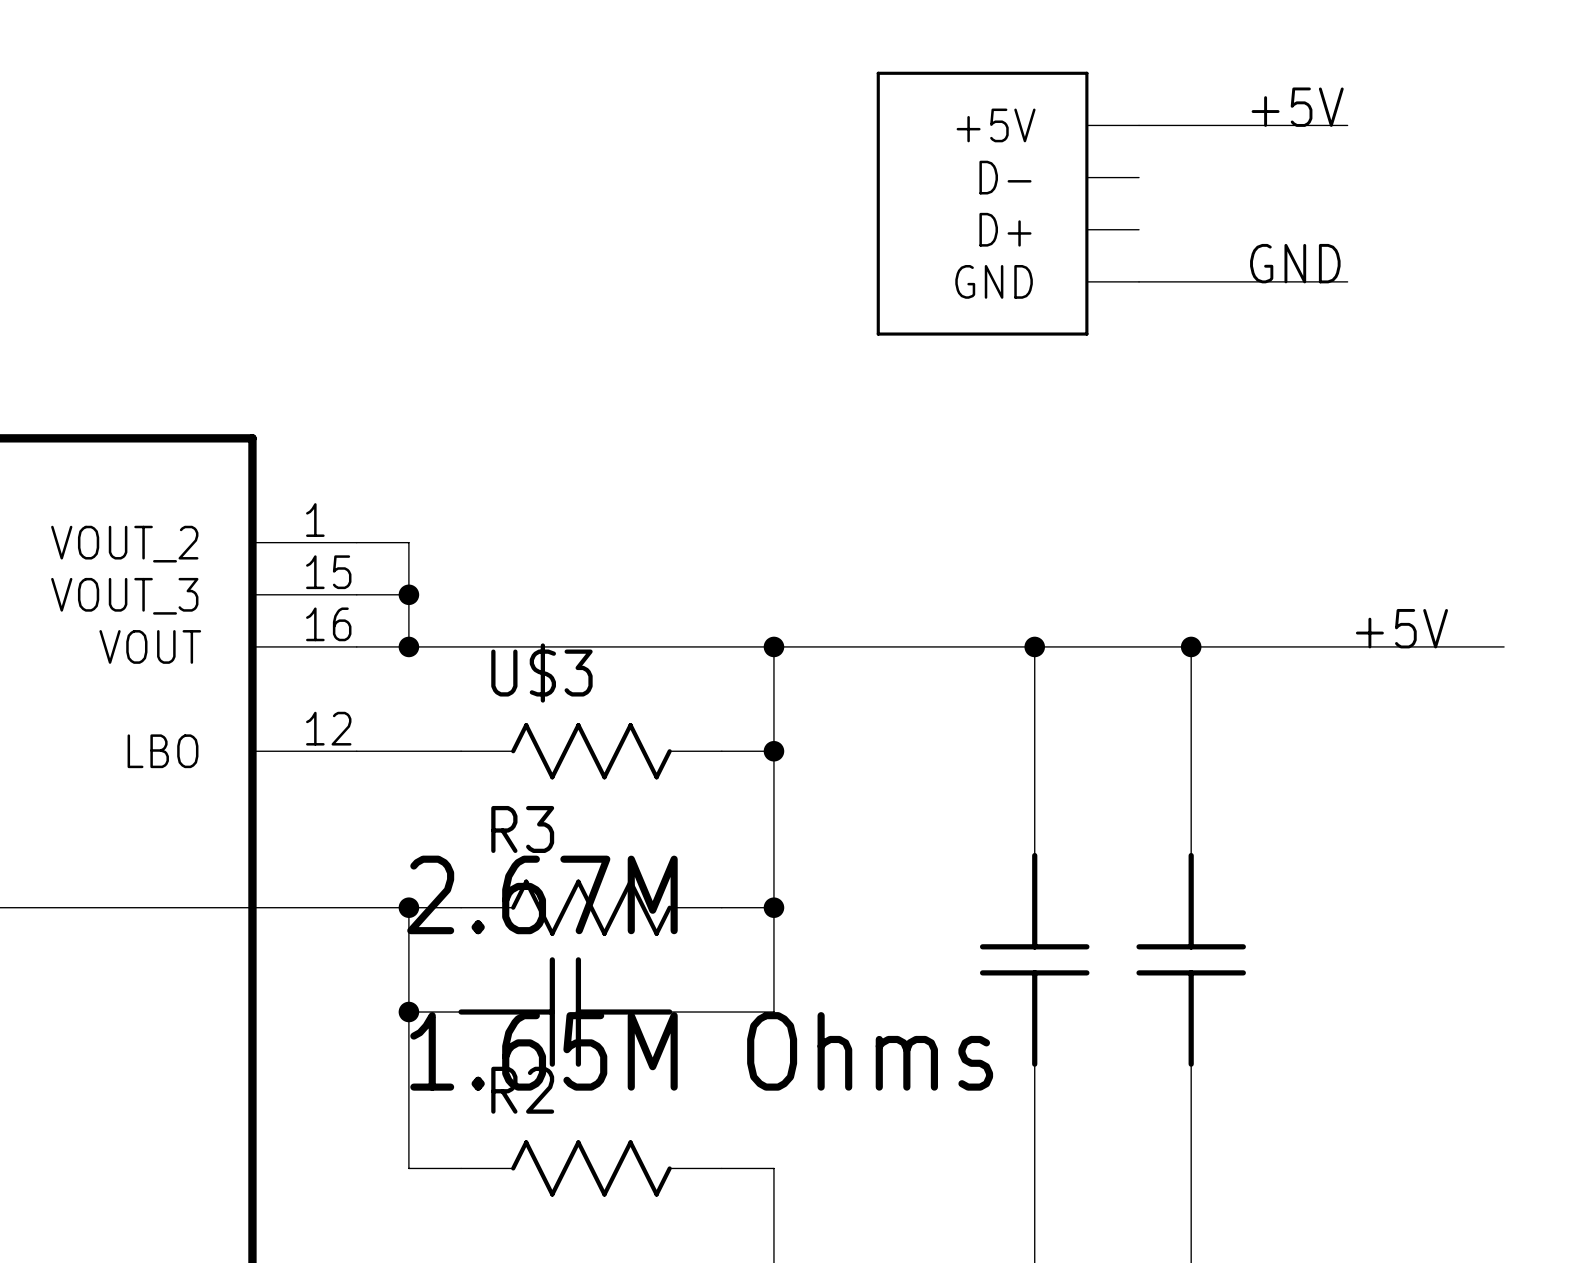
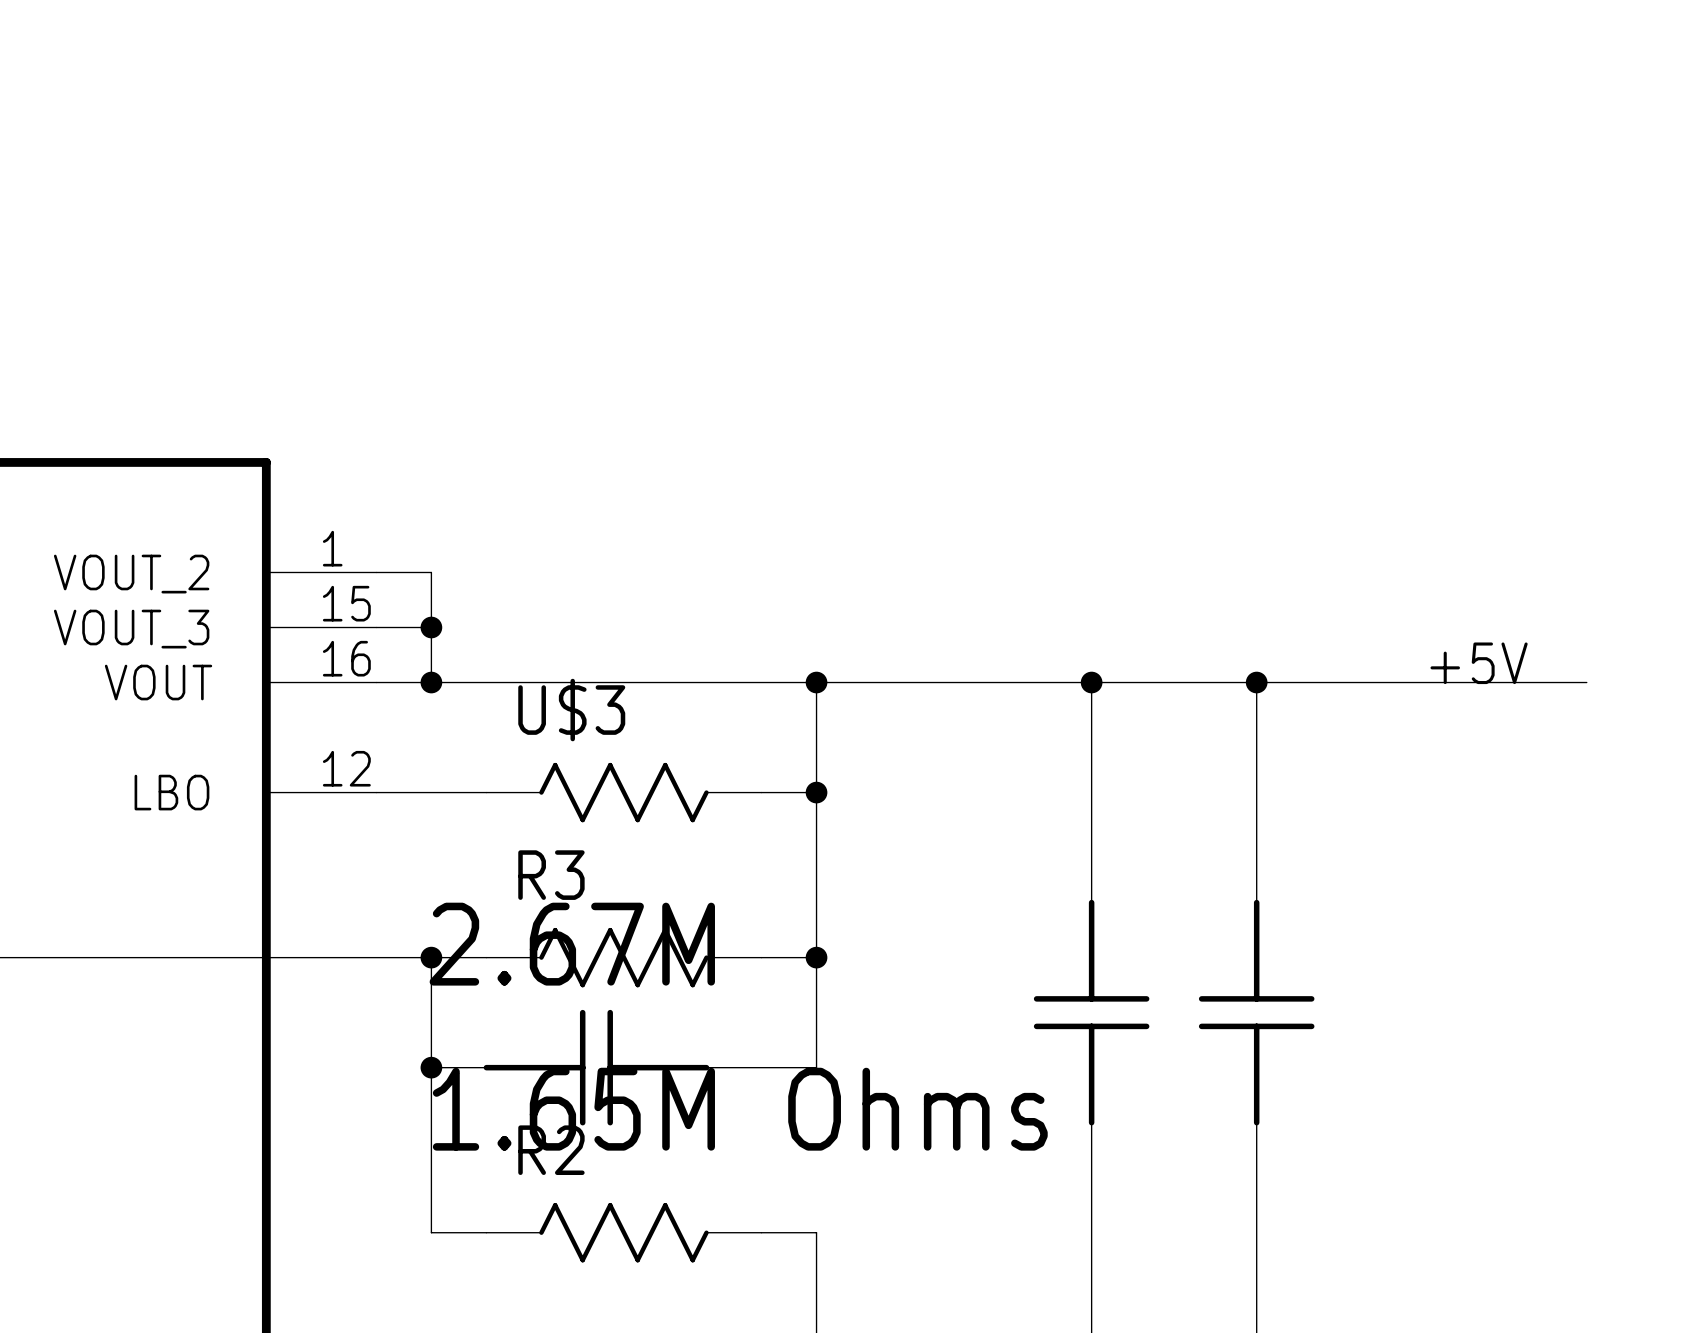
label: +5V (1297, 107) -> none
wire: (1139, 125) (1347, 125) -> none
part: (1007, 203) -> none
label: GND (1295, 263) -> none
wire: (1139, 281) (1347, 281) -> none

